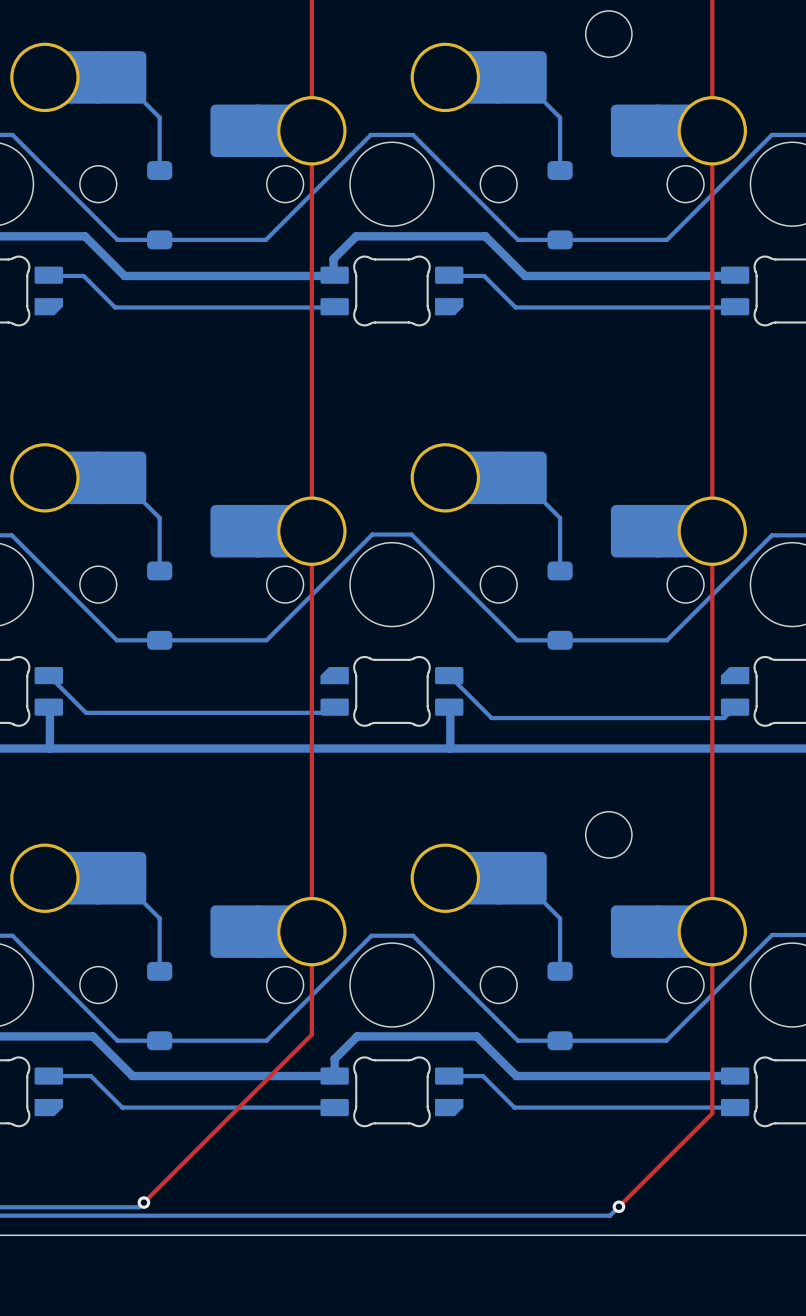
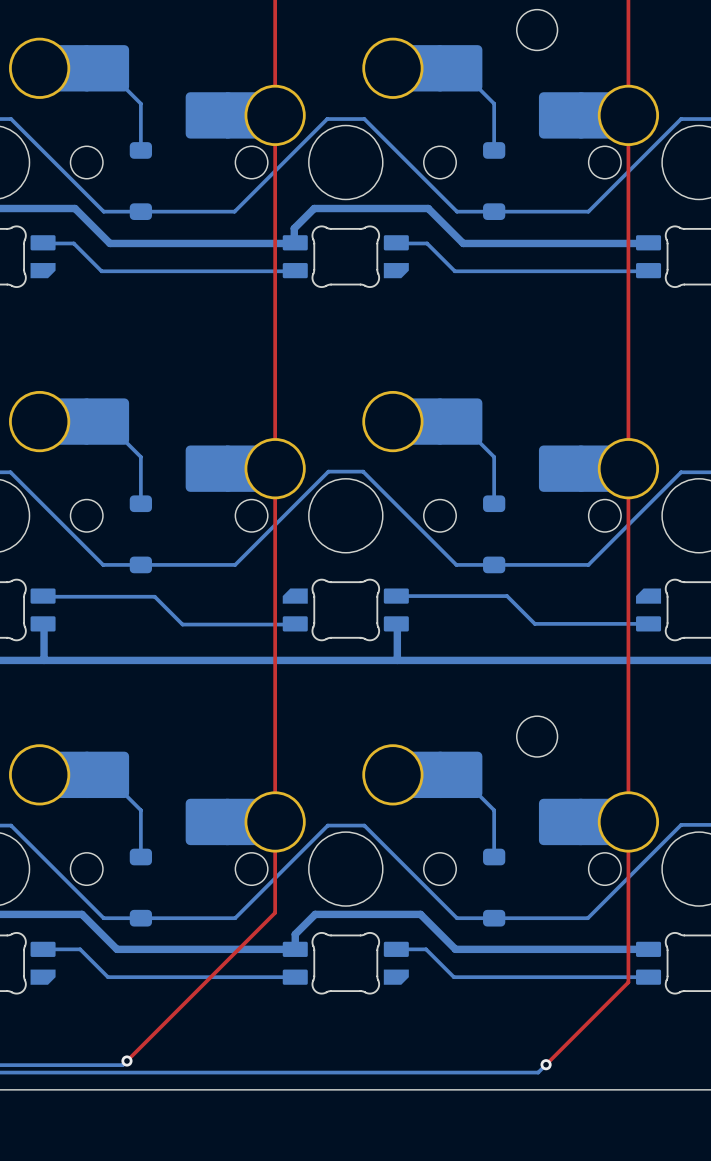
bottom track: (48, 675) (86, 712) (328, 712) -> none
bottom track: (449, 675) (491, 718) (724, 718) (735, 707) -> (396, 596) (507, 596) (534, 623) (648, 623)
bottom track: none -> (44, 596) (154, 596) (182, 624) (296, 624)

